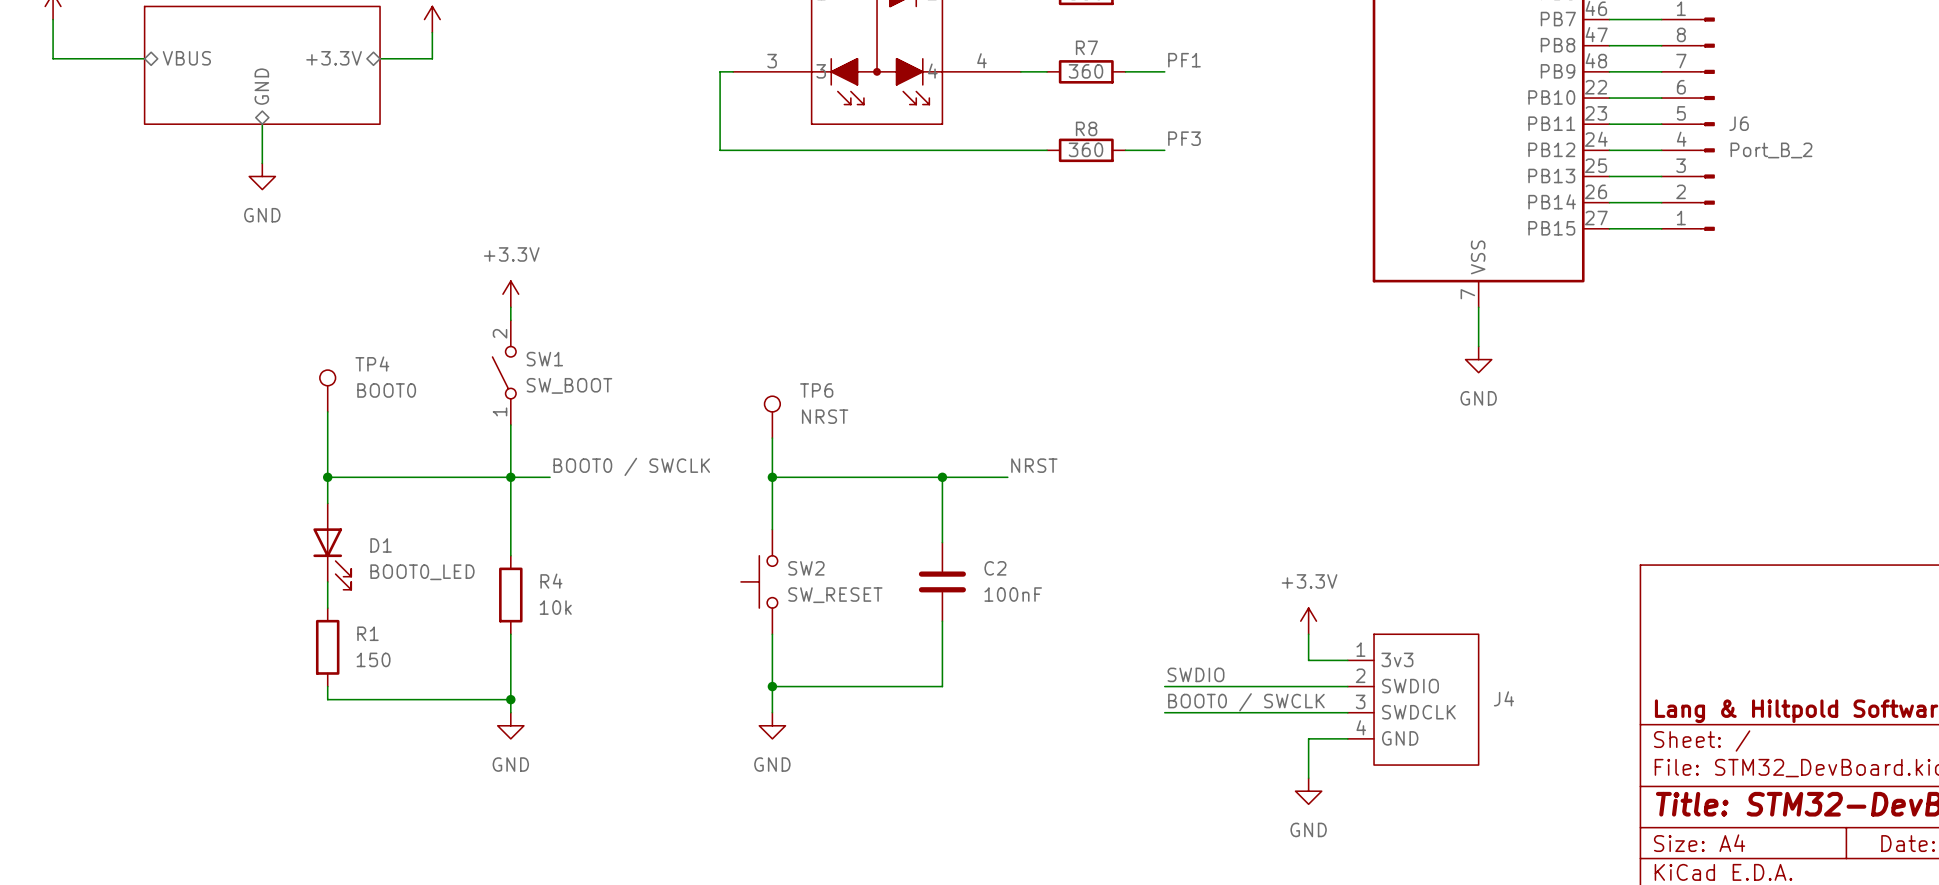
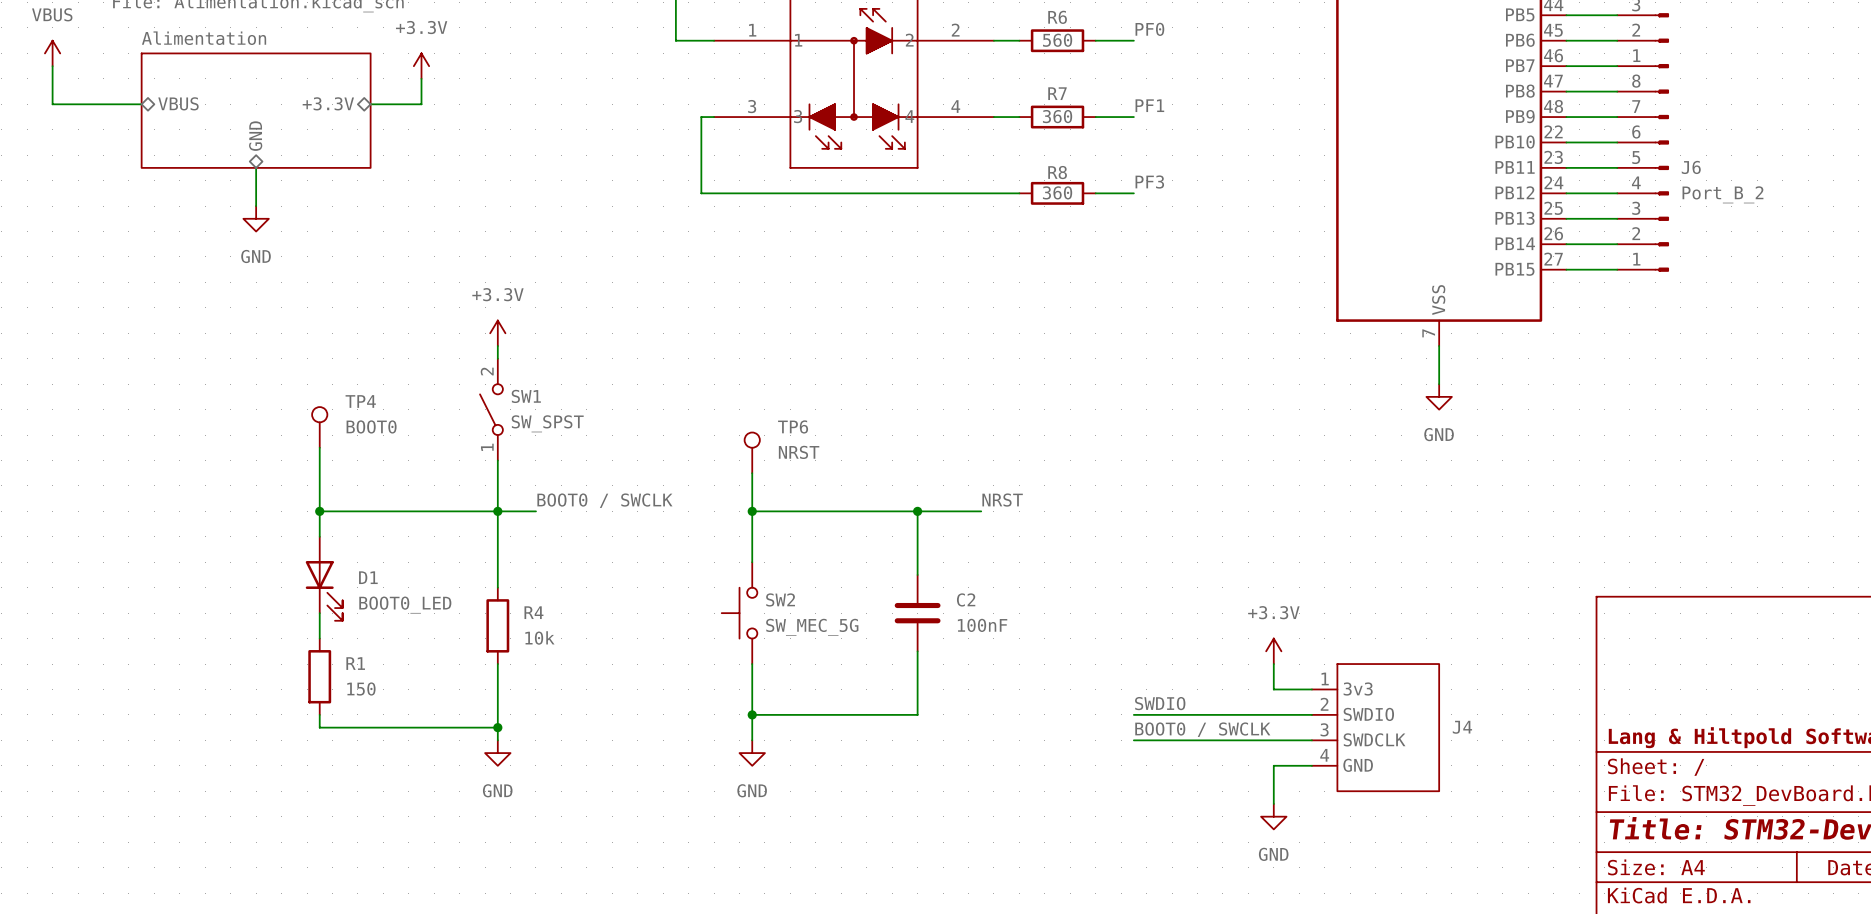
SW1 value: SW_BOOT (569, 385) -> SW_SPST (547, 423)
SW2 value: SW_RESET (835, 595) -> SW_MEC_5G (812, 627)

